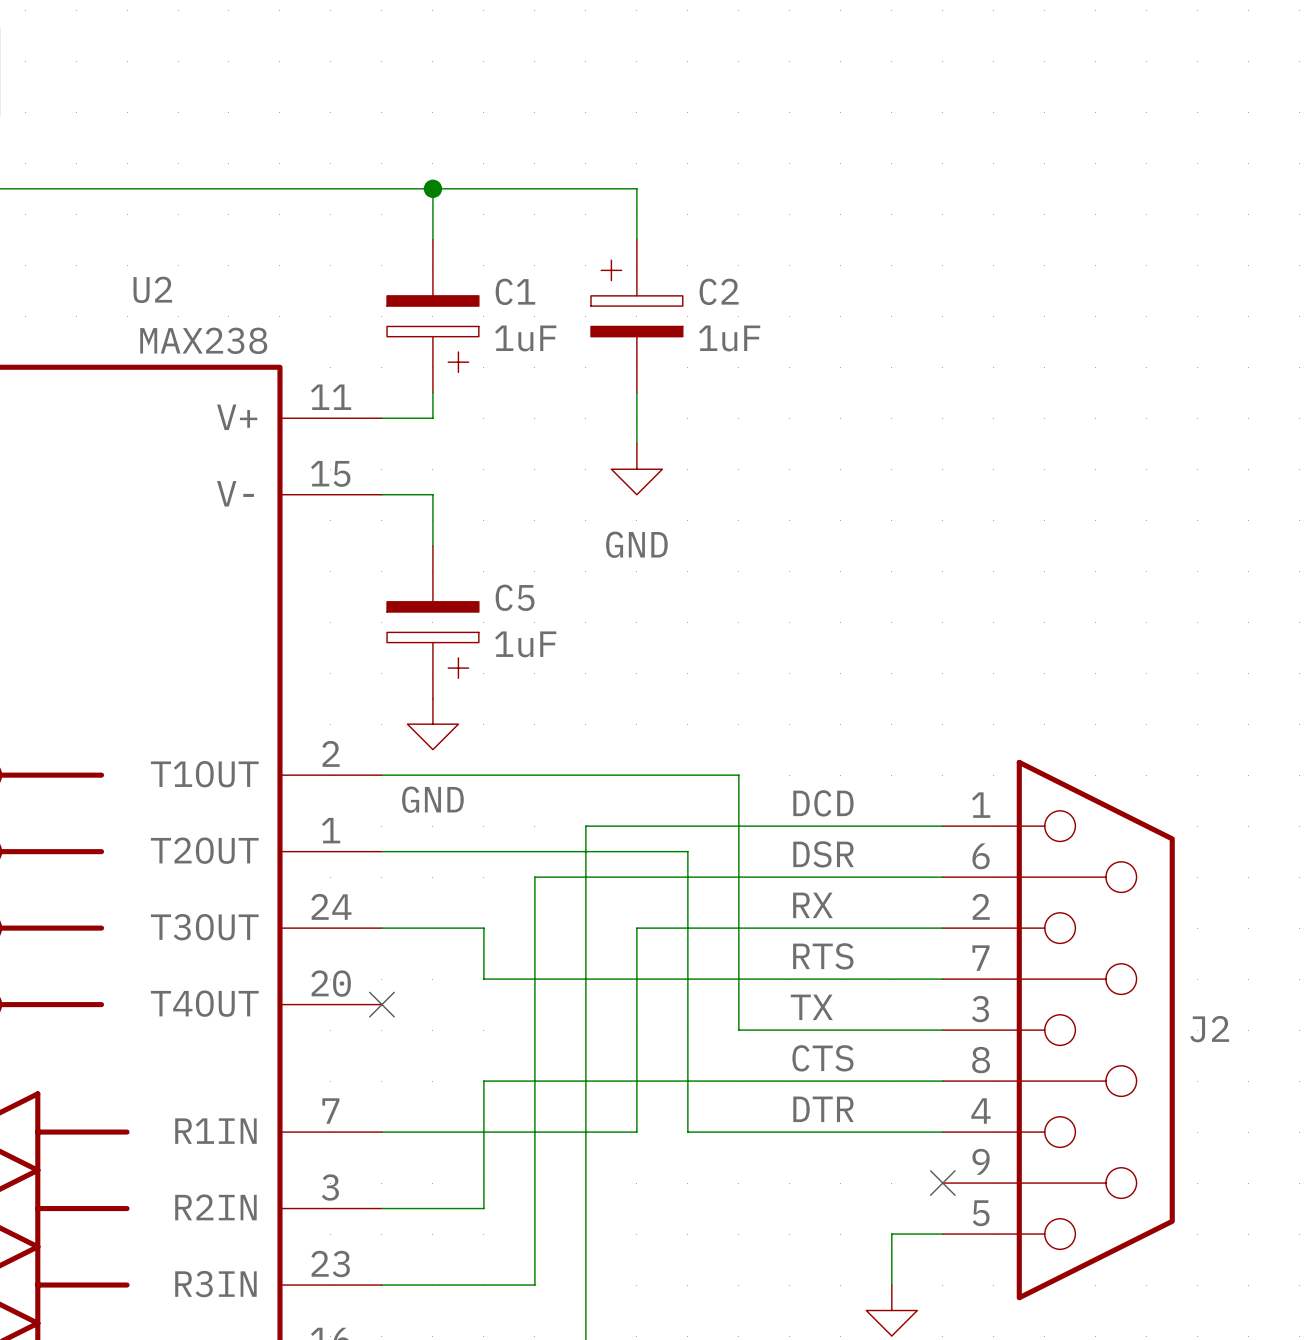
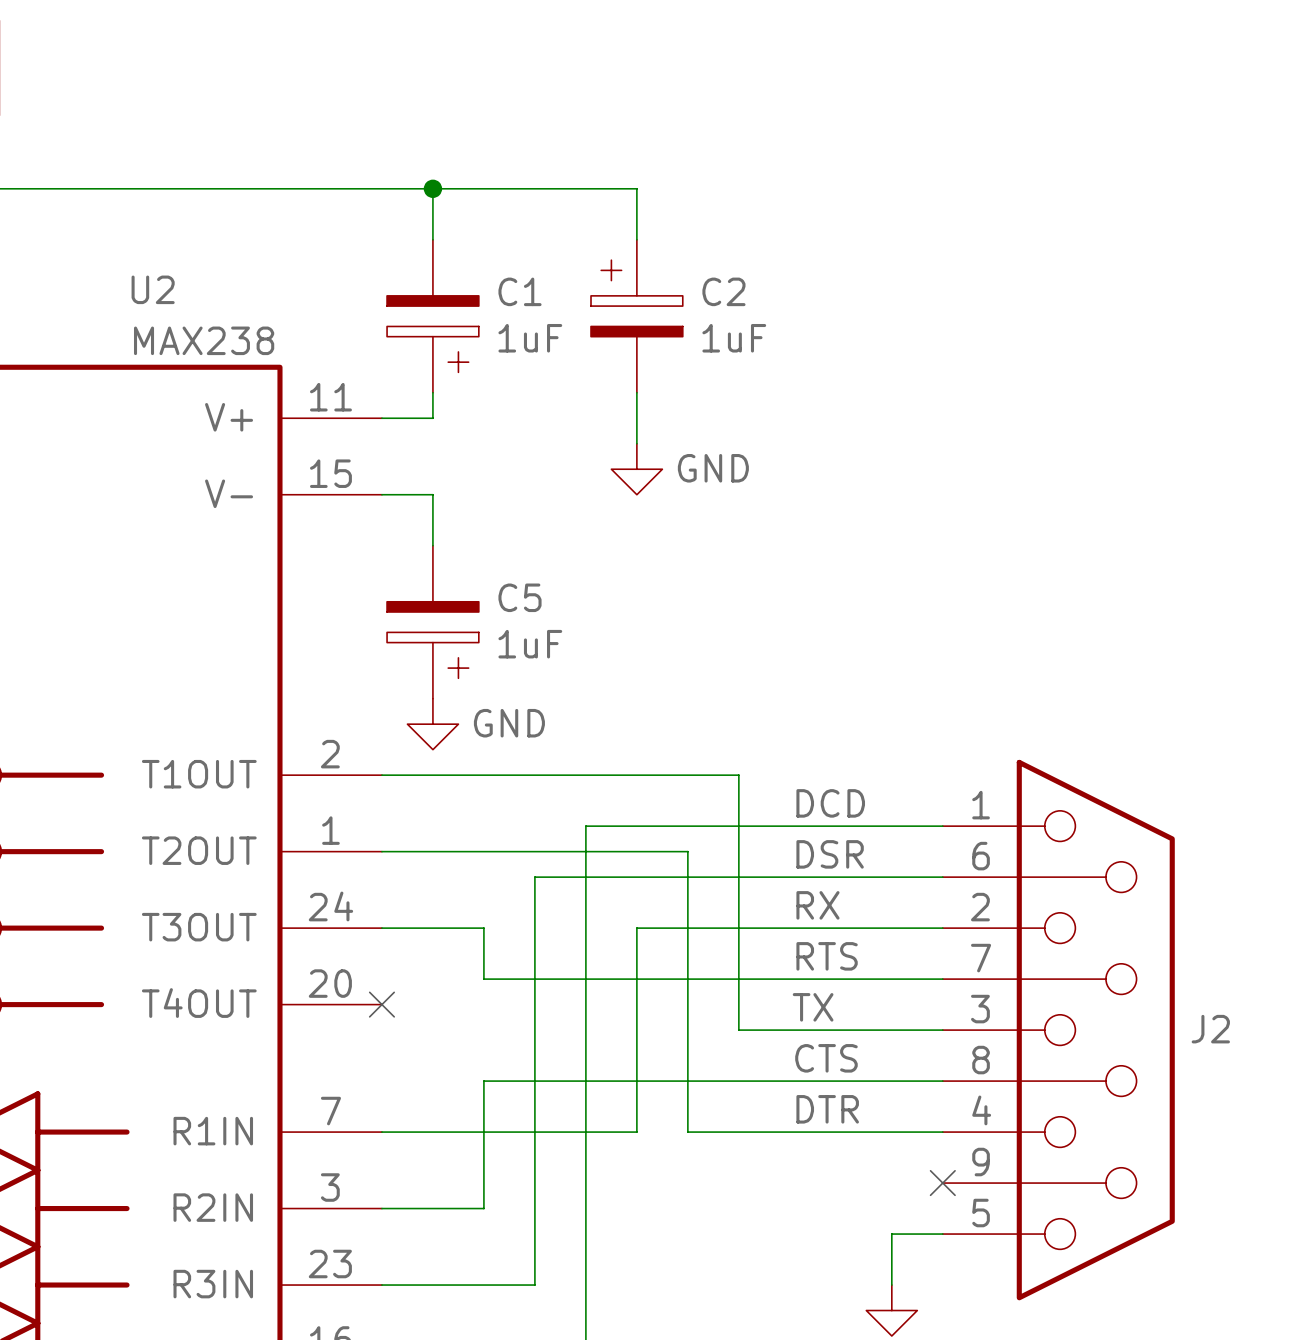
power symbol text position: GND (636, 544) -> GND (713, 468)
power symbol text position: GND (432, 799) -> GND (509, 723)

